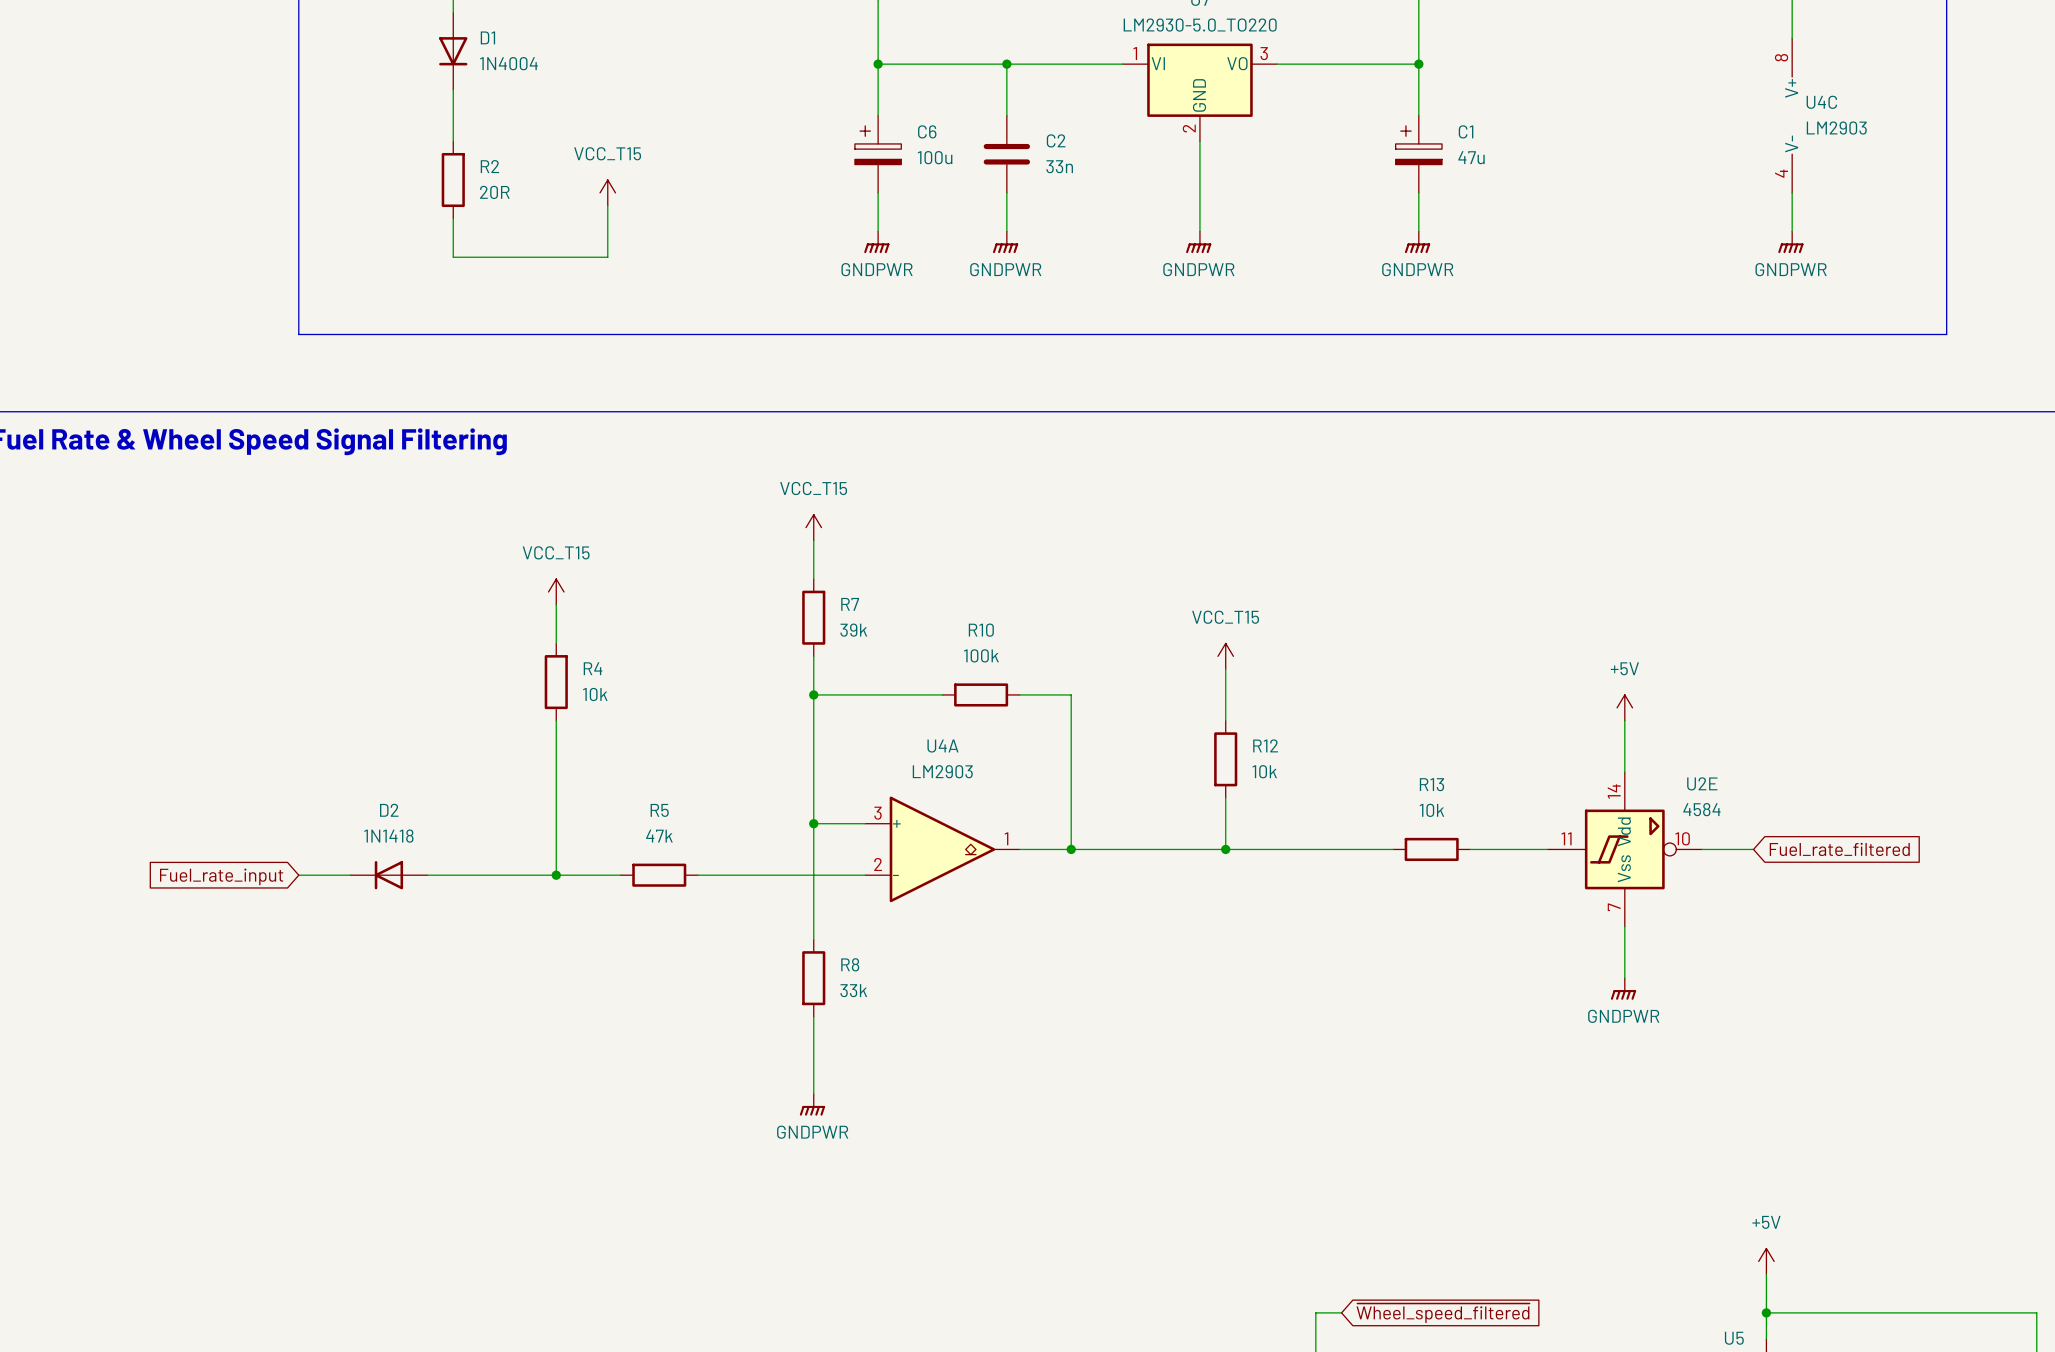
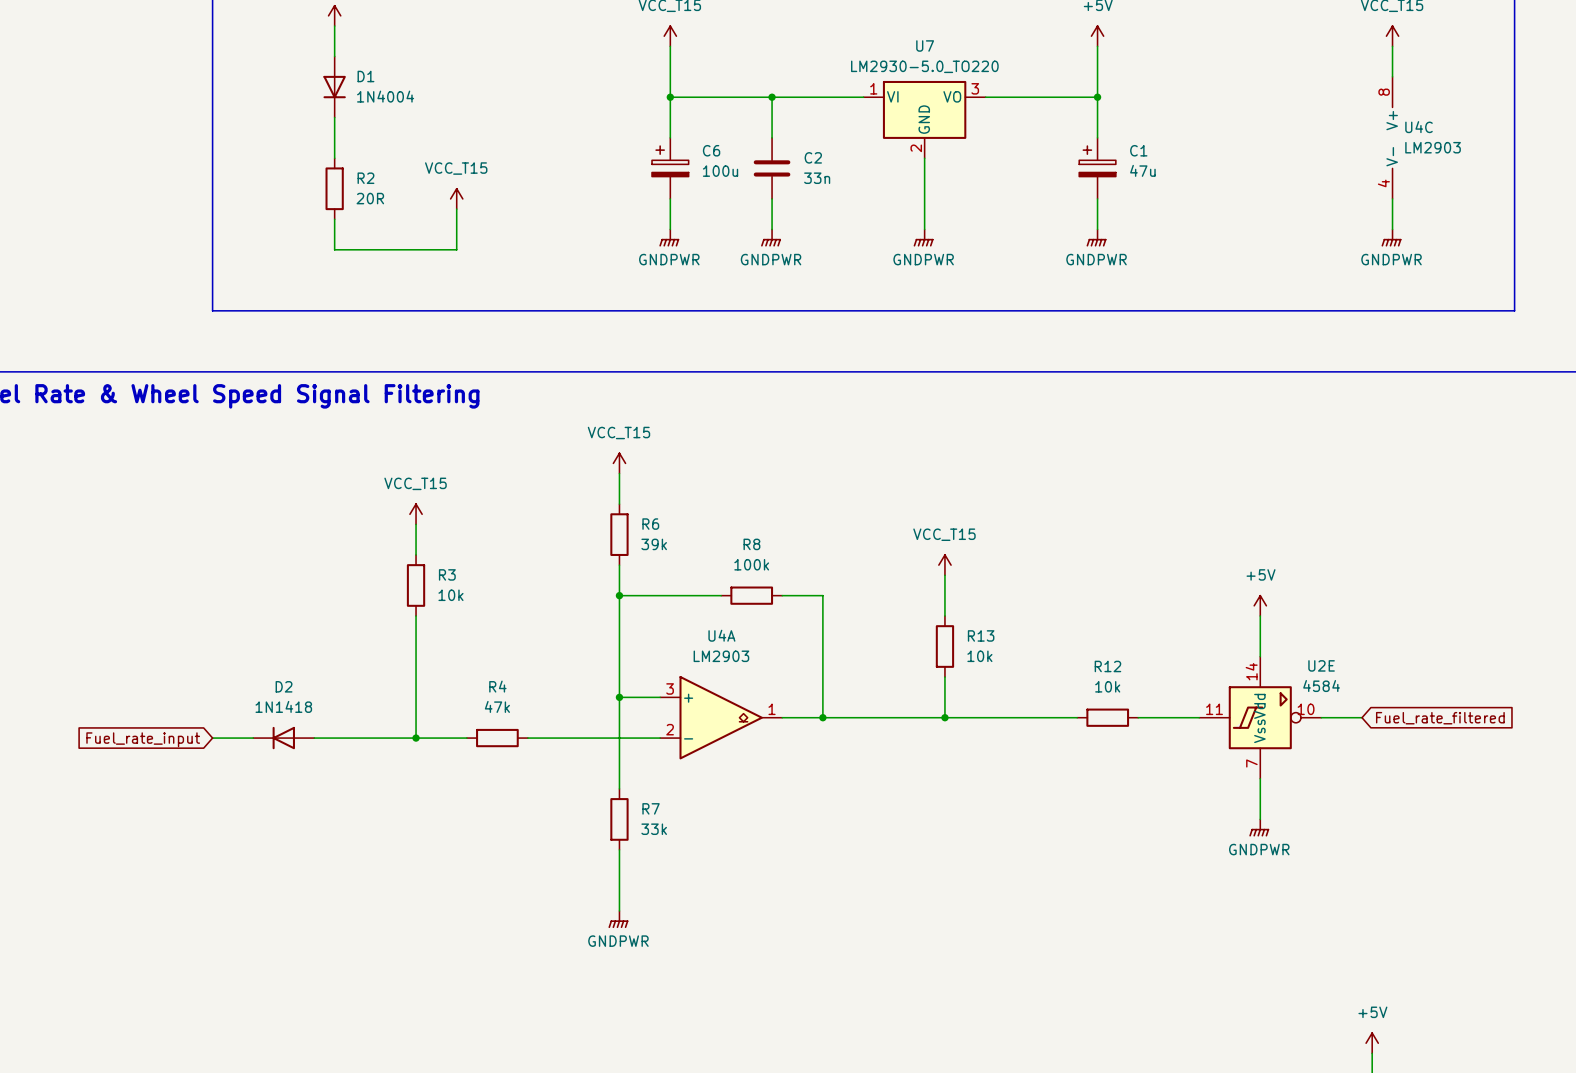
R7 name: R7 (850, 604) -> R6 (650, 524)
R10 name: R10 (981, 630) -> R8 (751, 544)
R4 name: R4 (593, 668) -> R3 (447, 574)
R12 name: R12 (1265, 745) -> R13 (981, 635)
R13 name: R13 (1431, 784) -> R12 (1107, 666)
R5 name: R5 (659, 810) -> R4 (497, 686)
R8 name: R8 (850, 964) -> R7 (651, 808)

